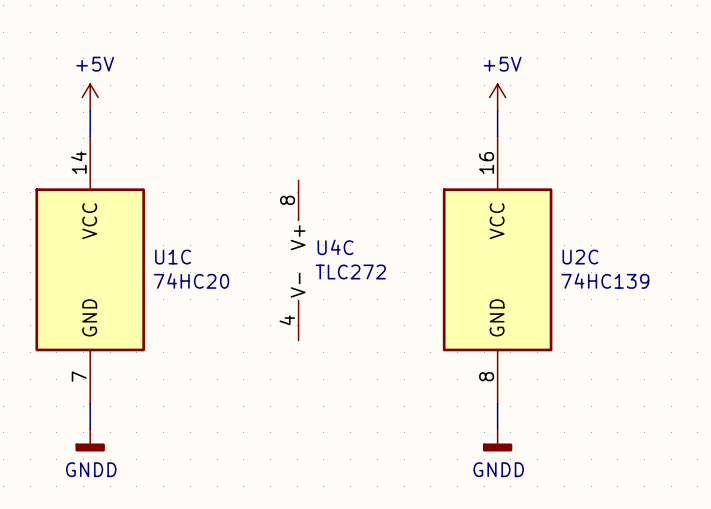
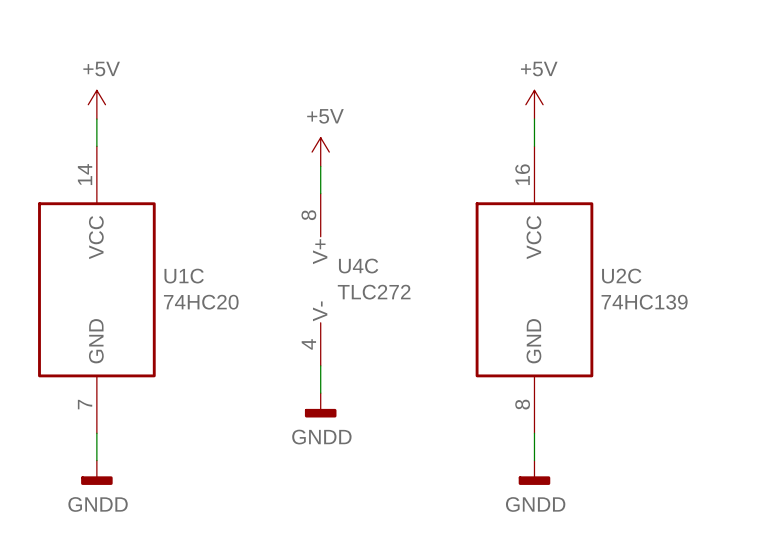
power symbol: none -> +5V (320, 152)
wire: none -> (320, 166) (320, 193)
wire: none -> (320, 365) (320, 393)
power symbol: none -> GNDD (320, 405)

